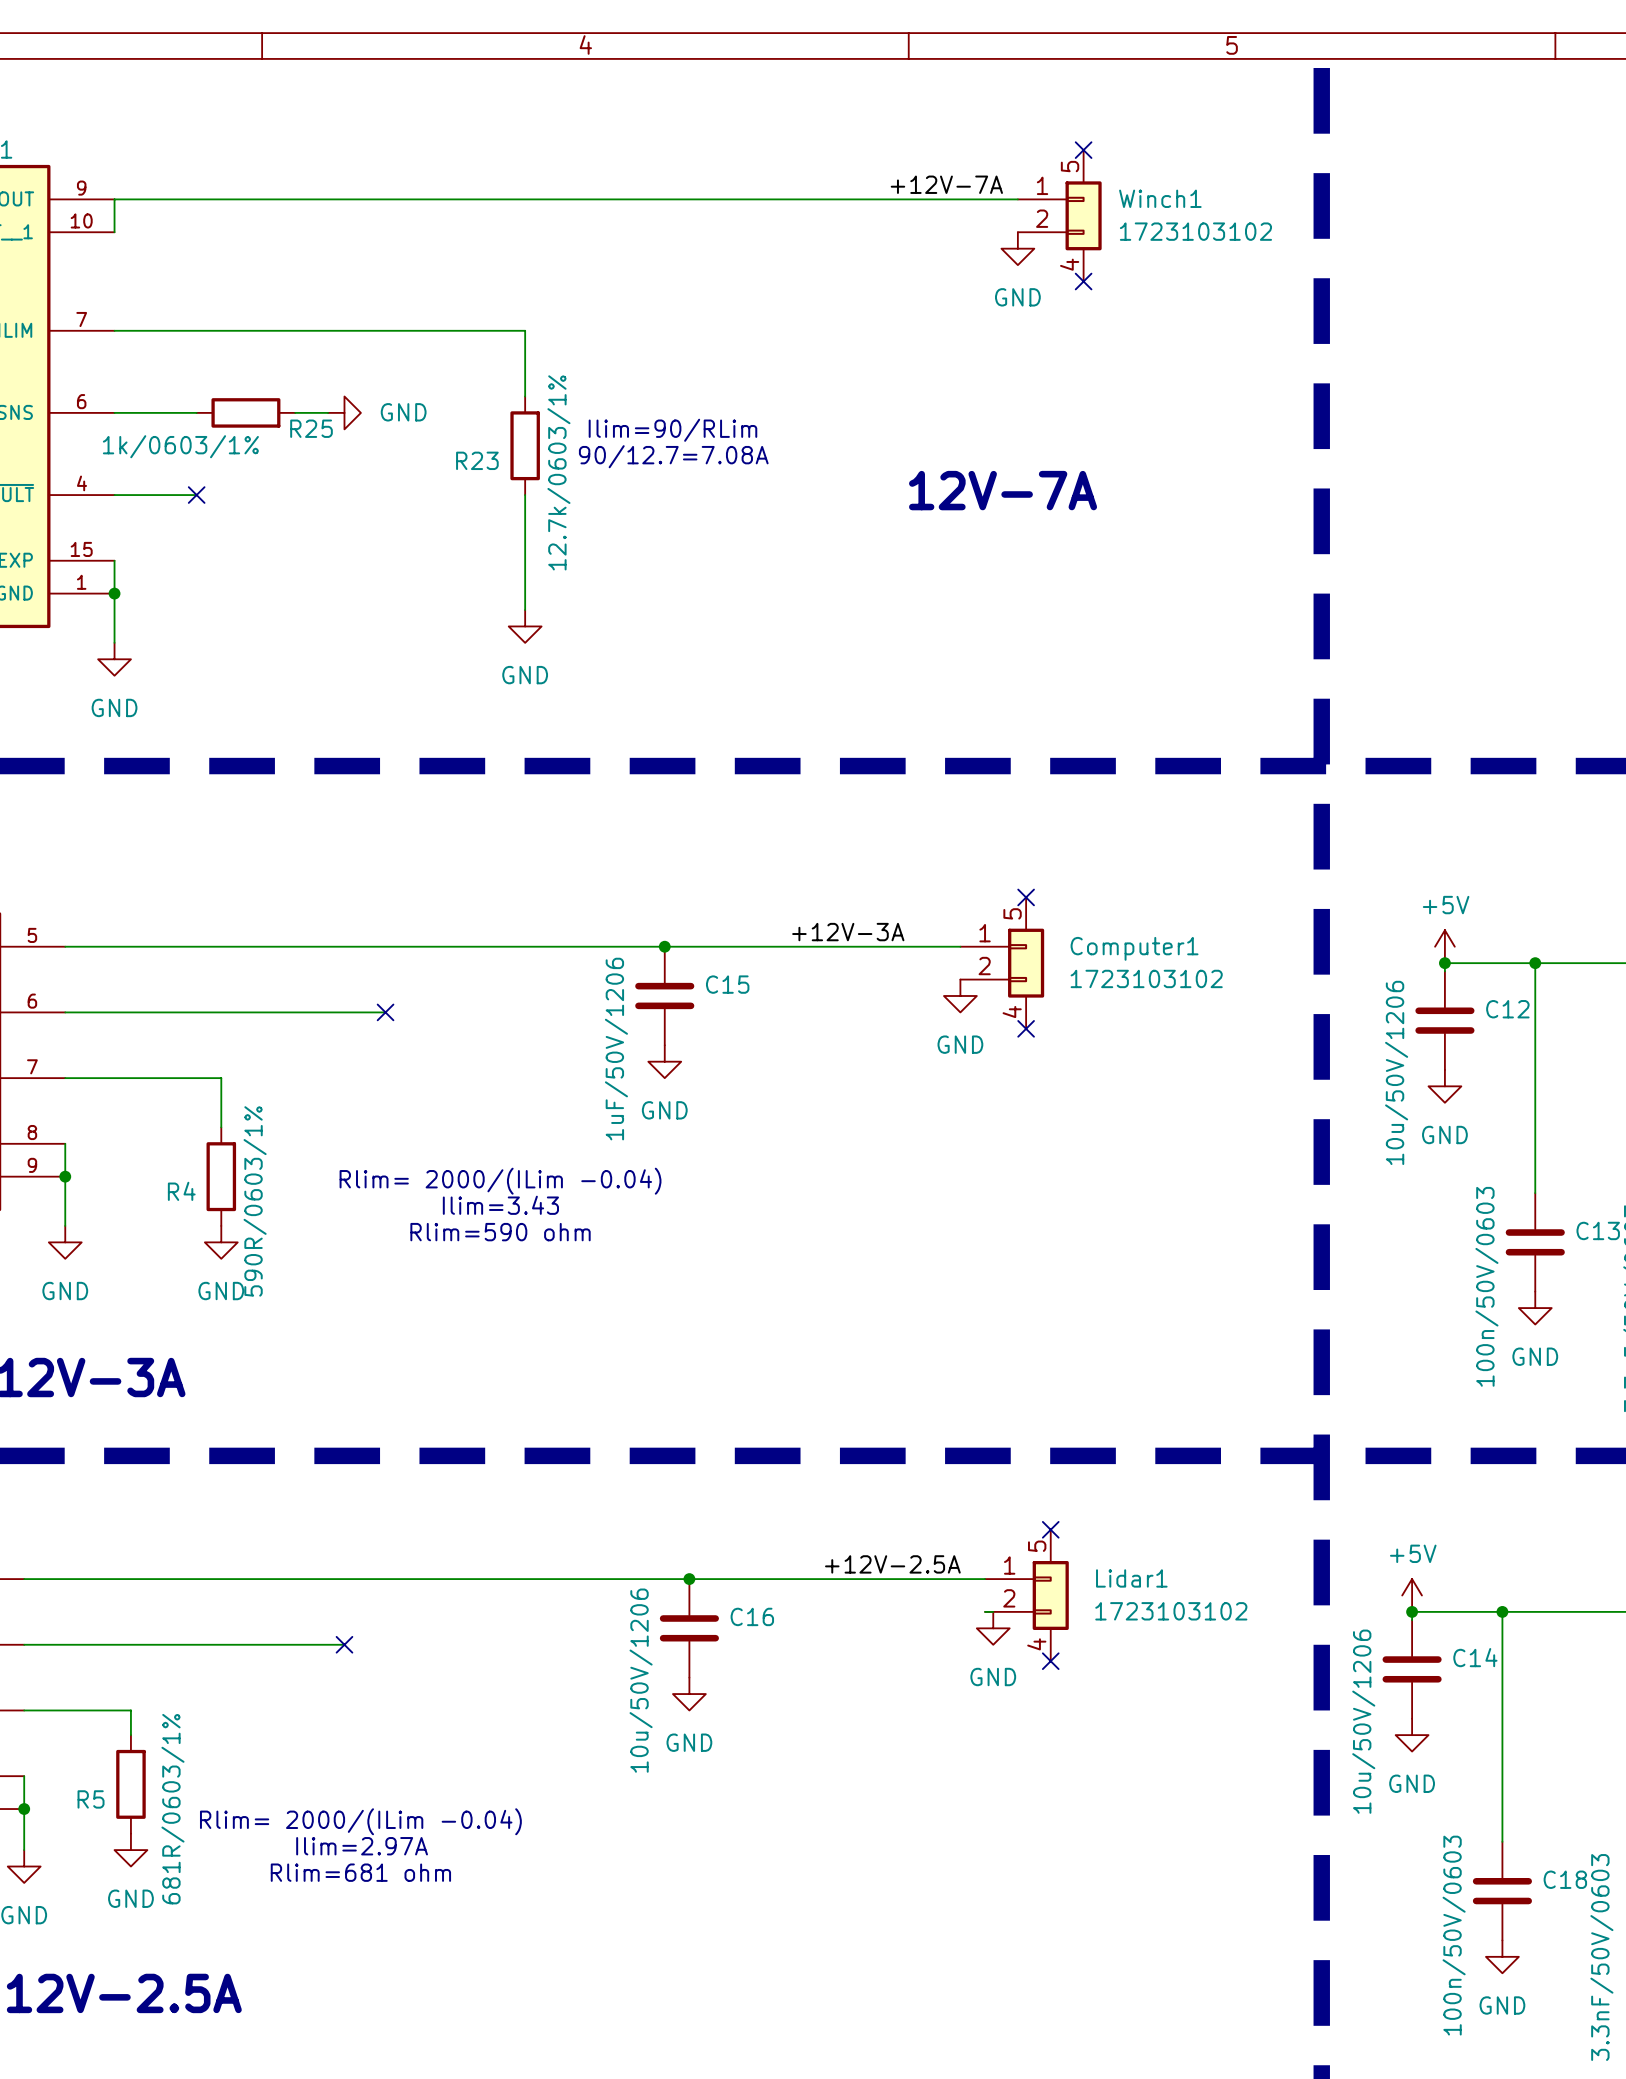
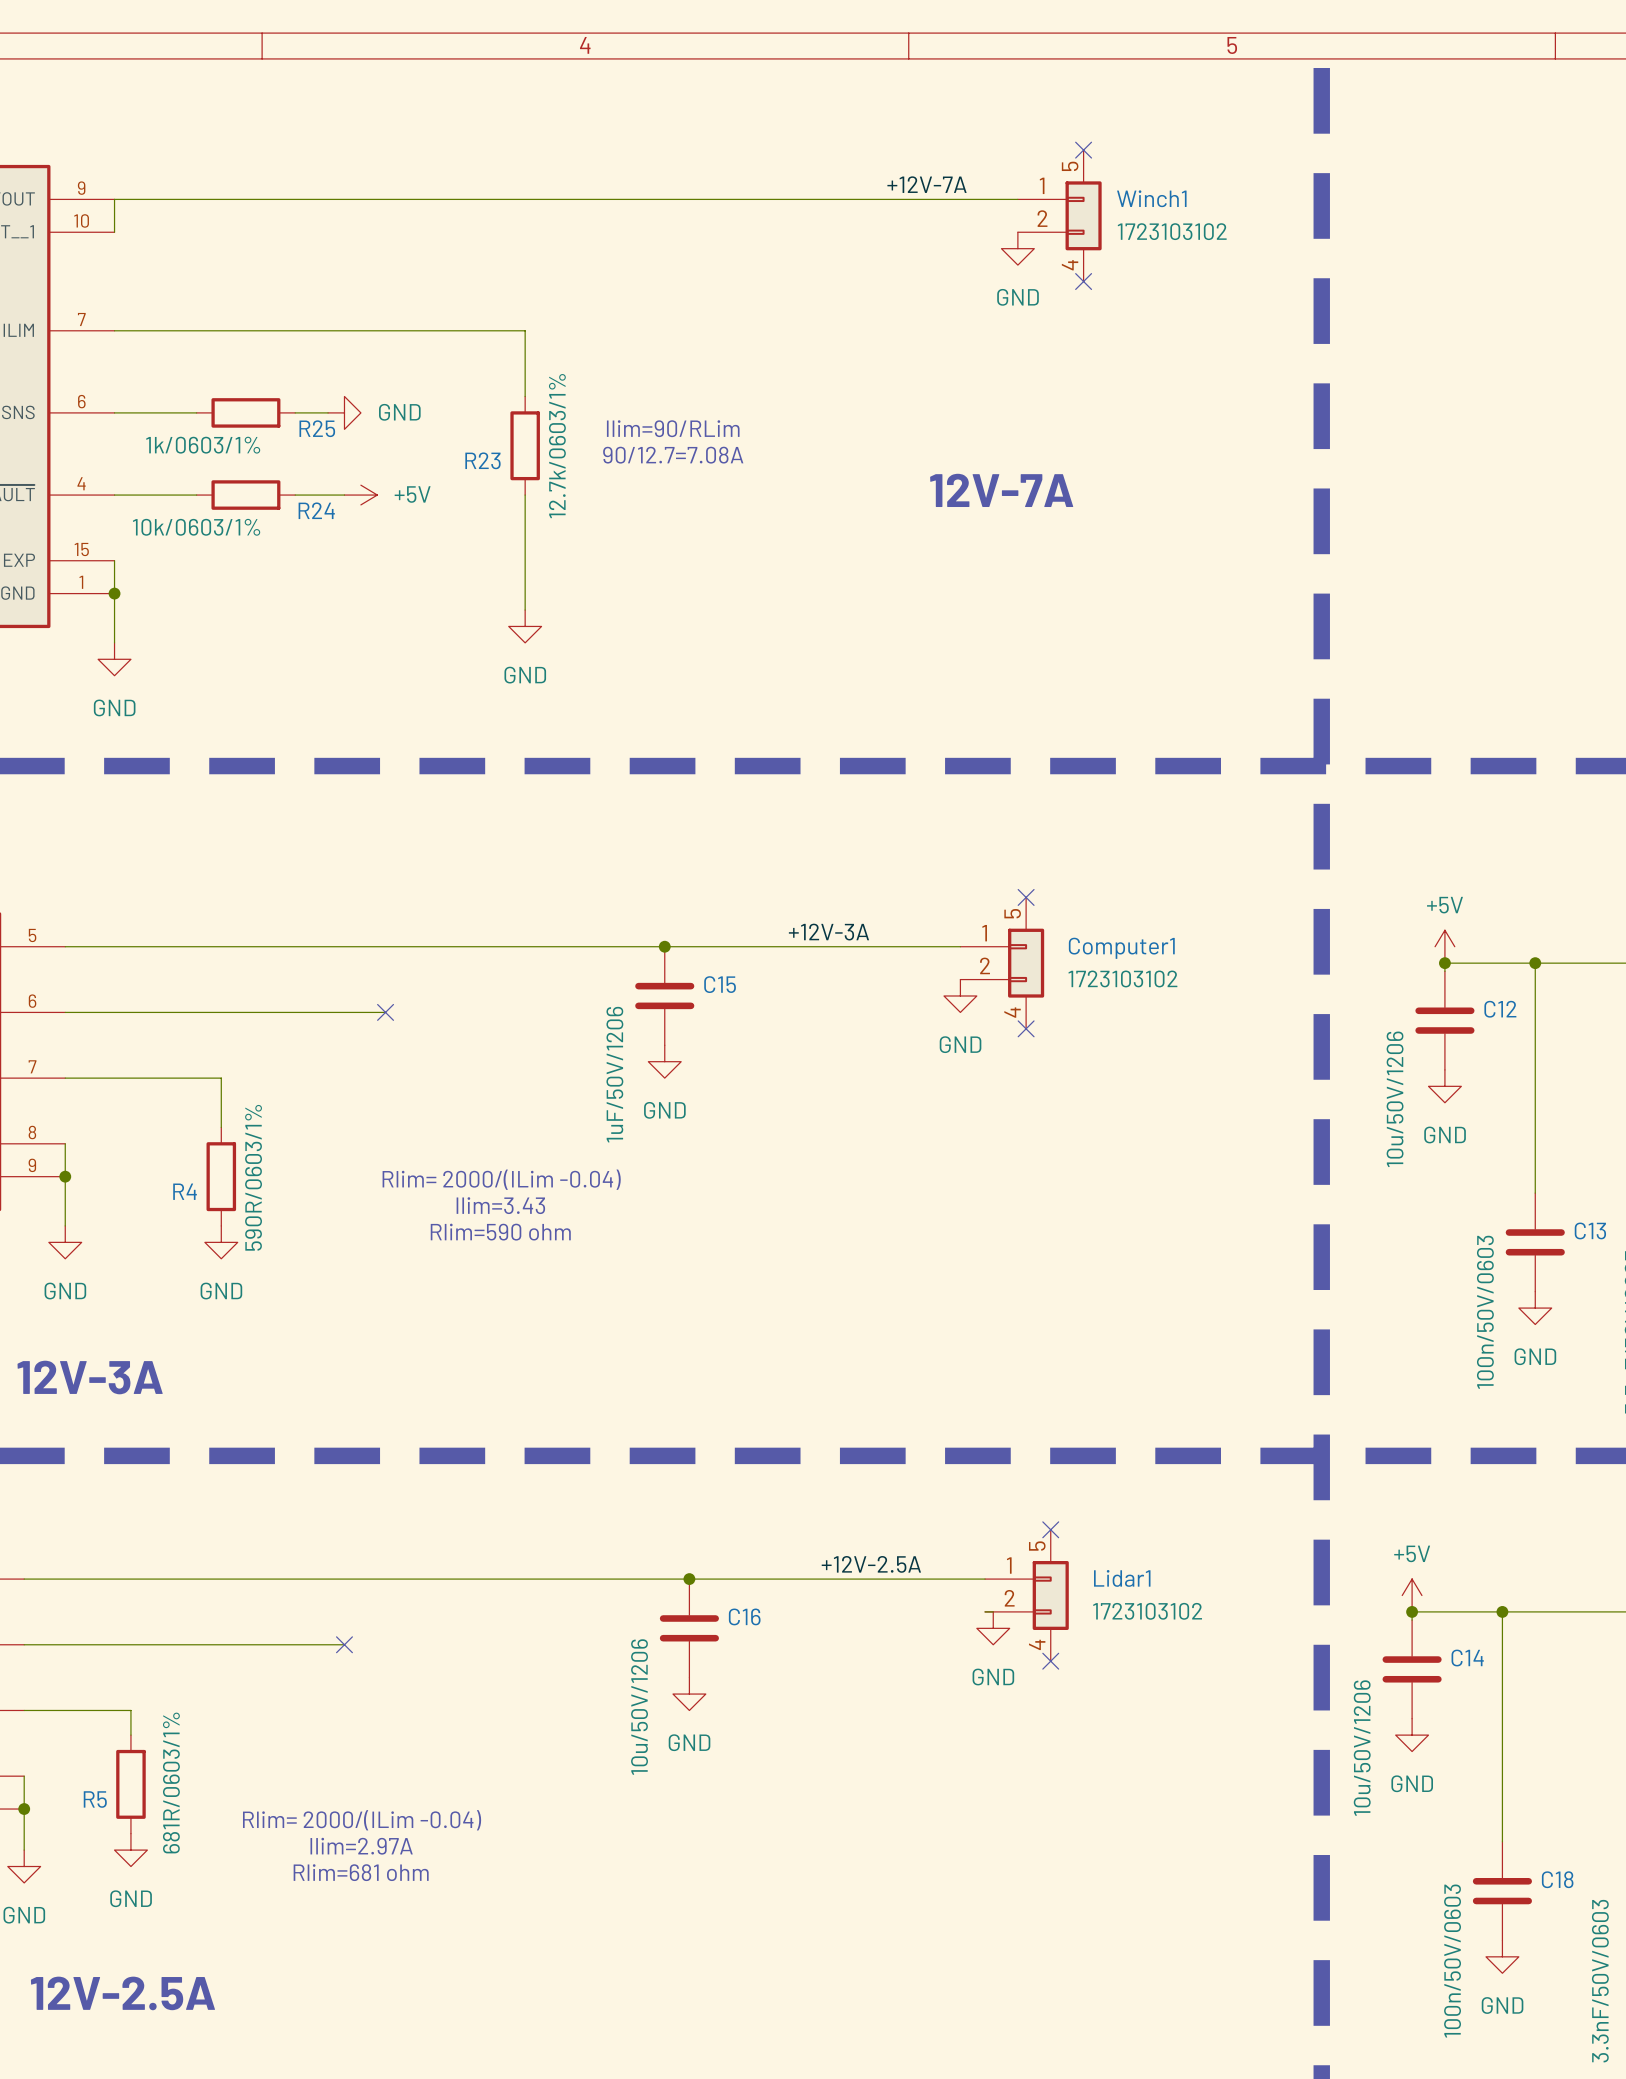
no-connect mark: (196, 495) -> none
R24: none -> 10k/0603/1% (245, 495)
wire: none -> (295, 495) (344, 495)
power symbol: none -> +5V (360, 495)

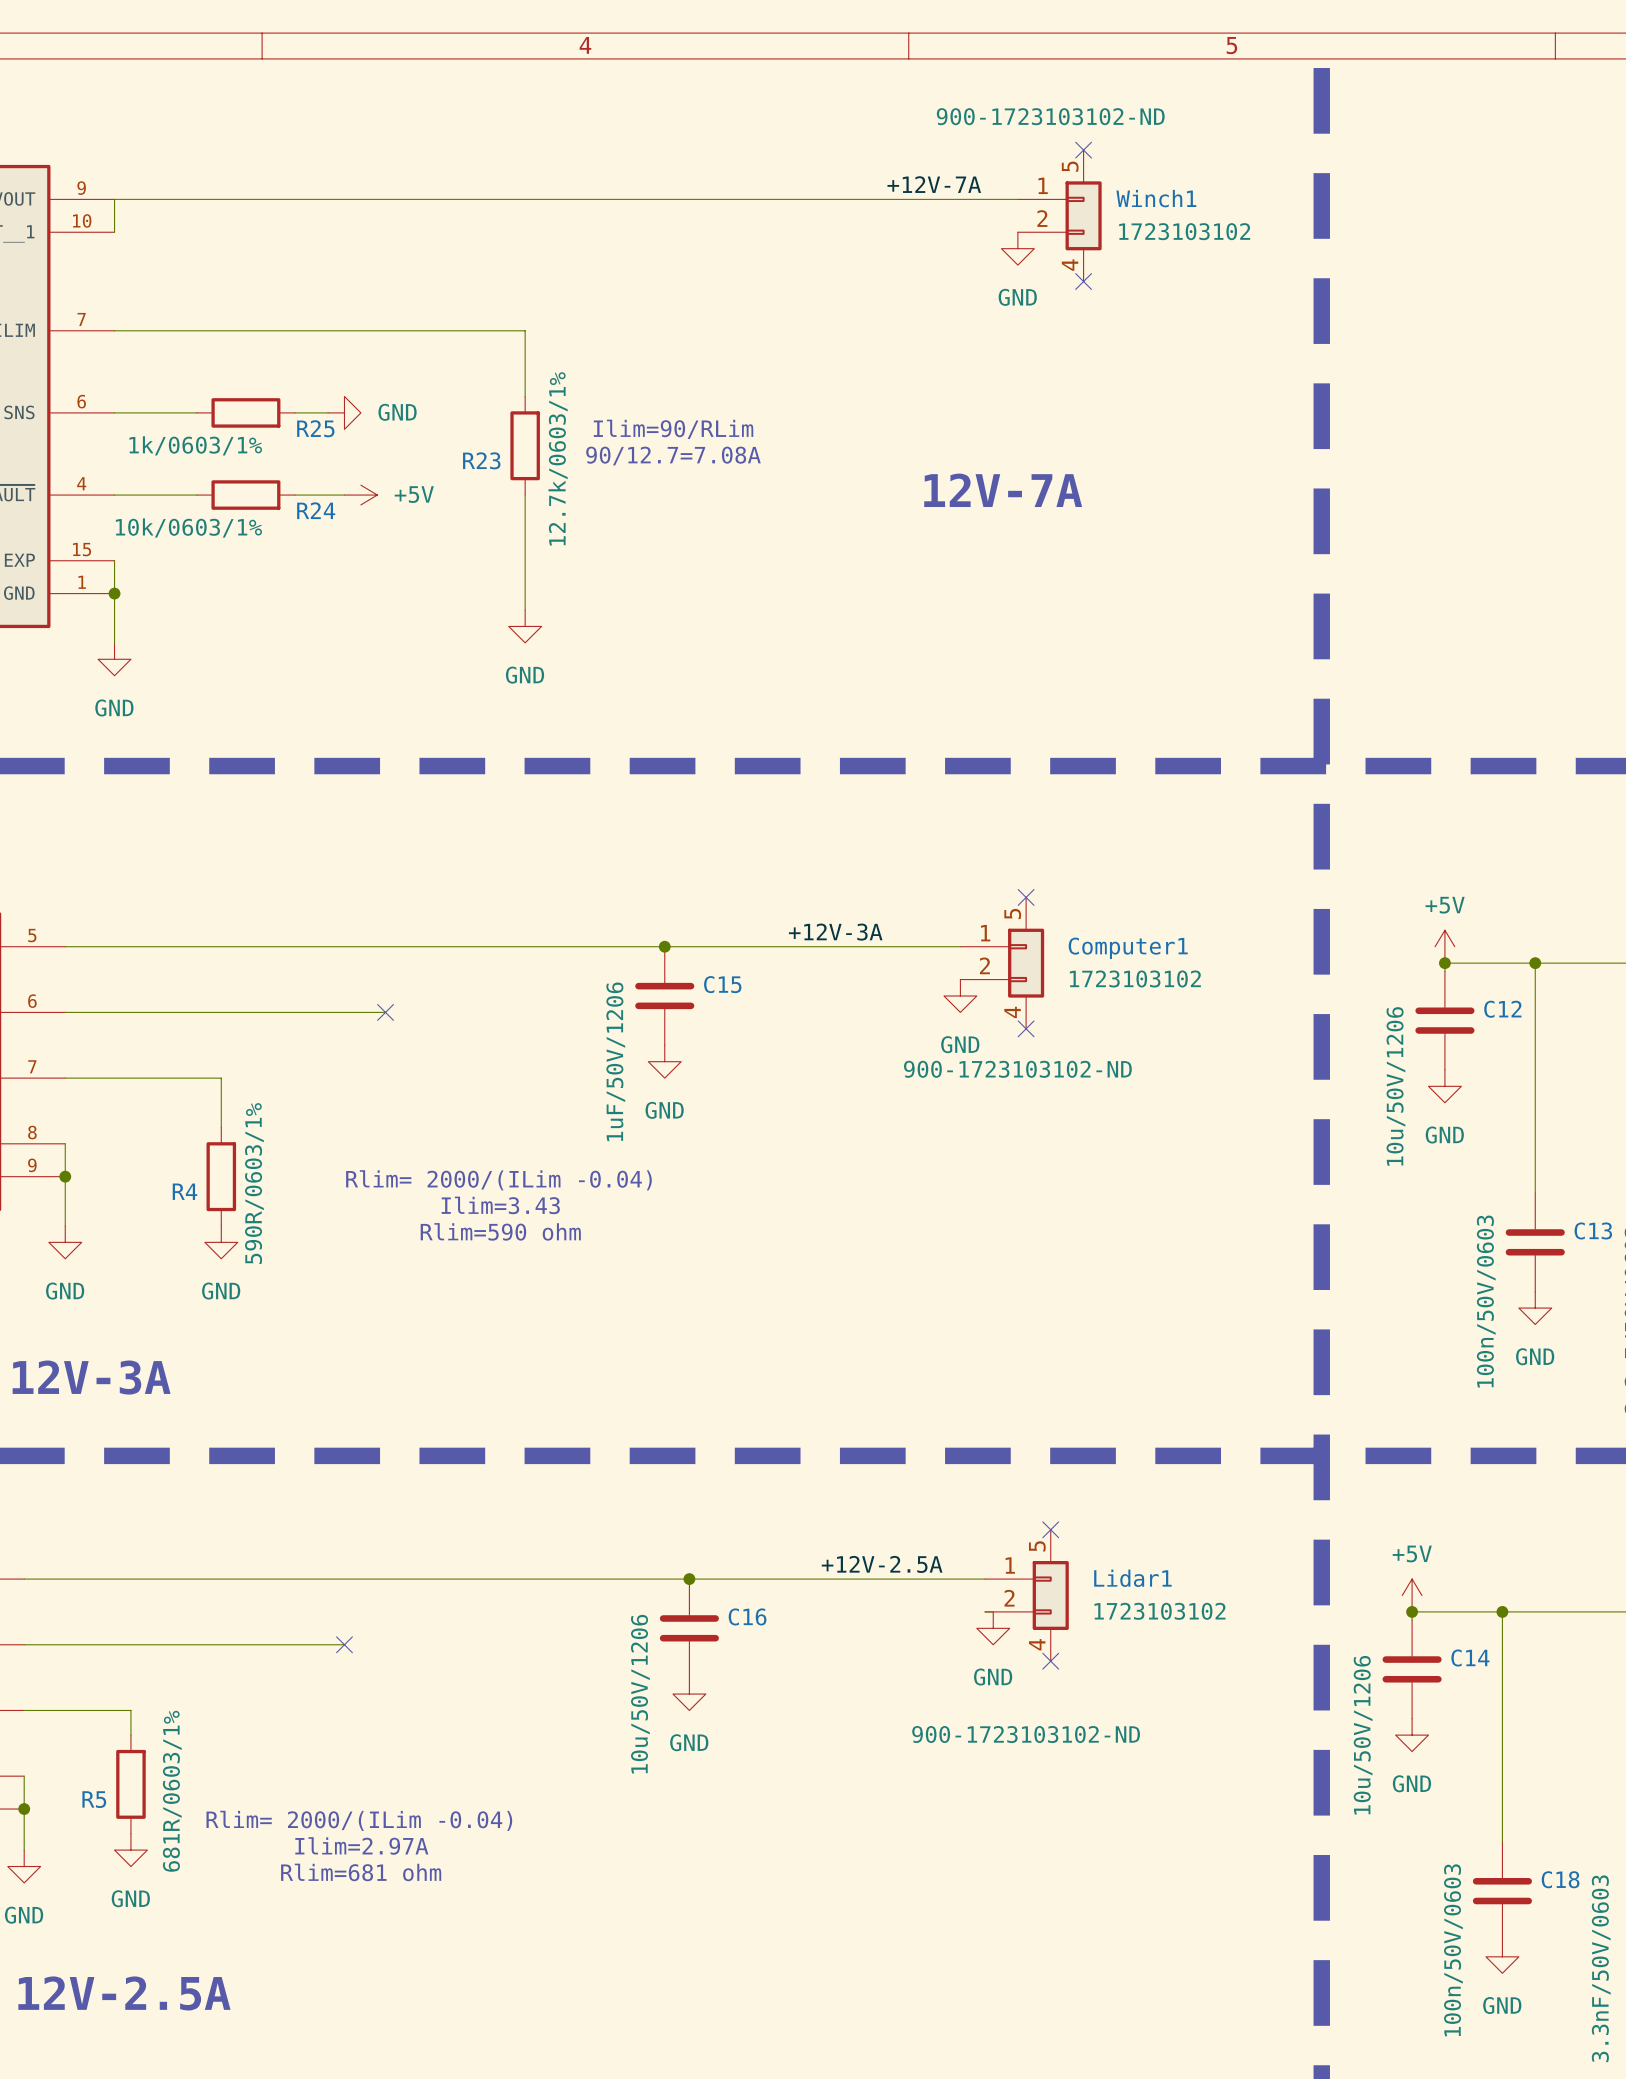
Winch1 text: none -> 900-1723103102-ND (1050, 116)
Computer1 text: none -> 900-1723103102-ND (1017, 1069)
Lidar1 text: none -> 900-1723103102-ND (1026, 1734)

